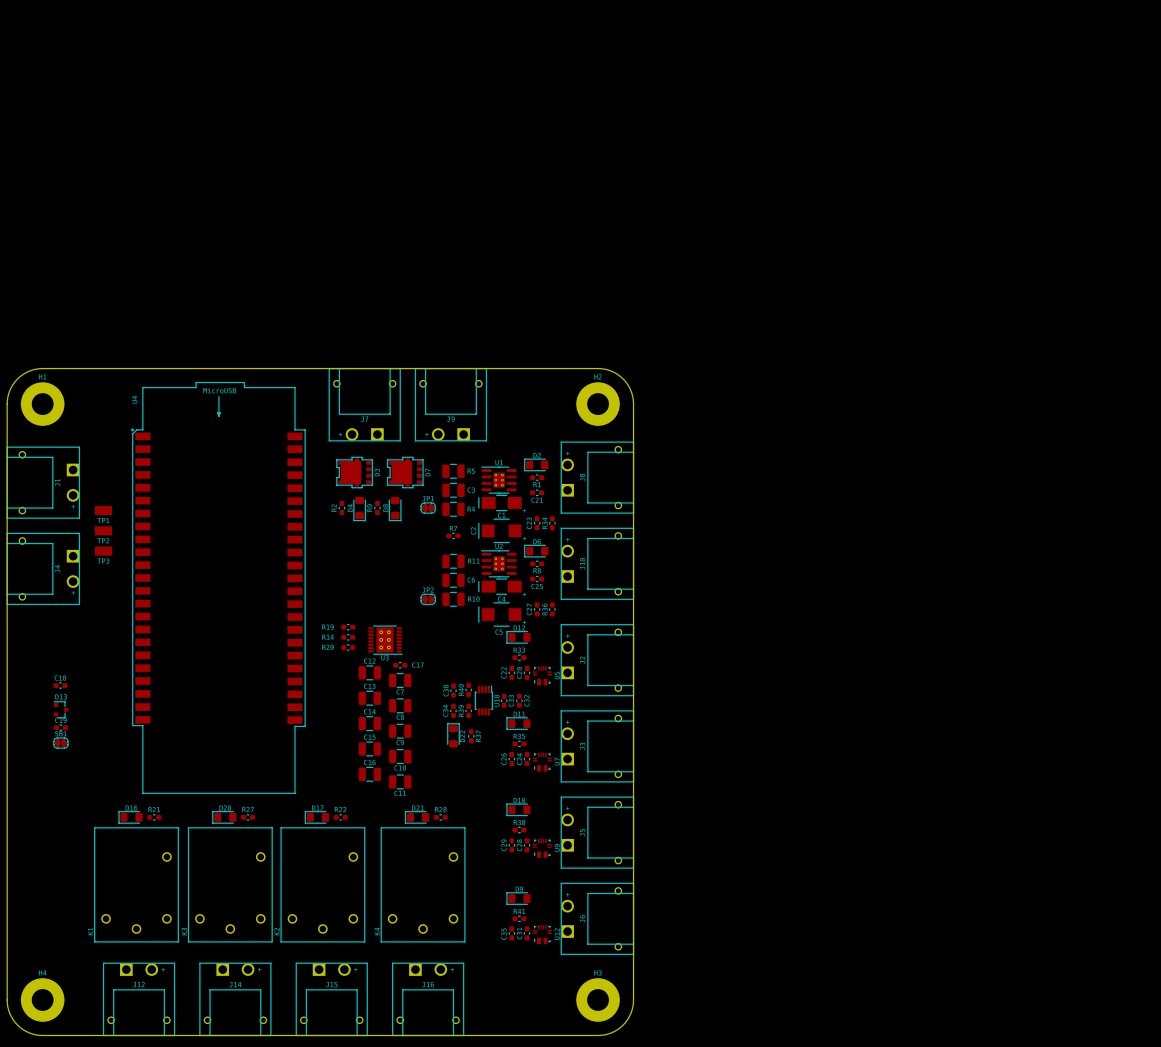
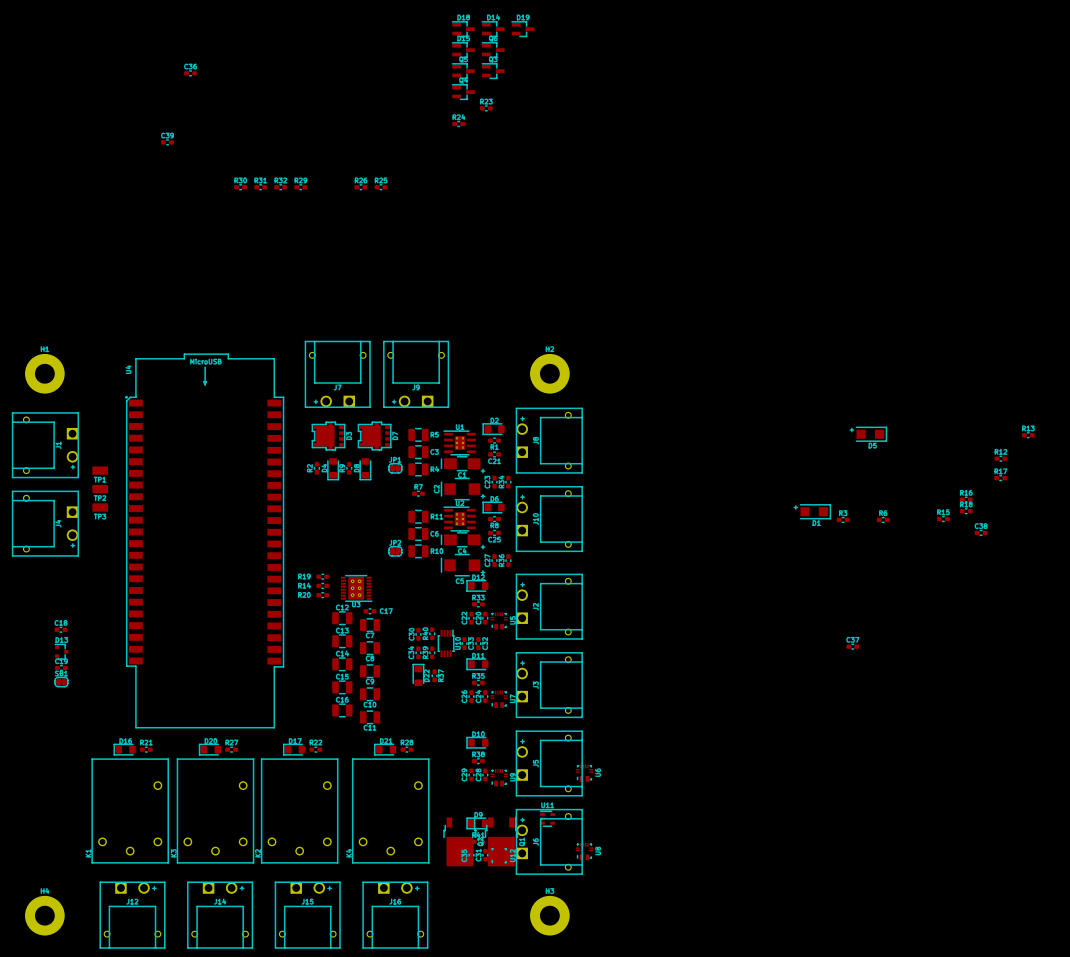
part: none -> (463, 29)
part: none -> (493, 29)
part: none -> (523, 29)
part: none -> (463, 50)
part: none -> (493, 50)
part: none -> (463, 71)
part: none -> (493, 71)
part: none -> (190, 73)
part: none -> (463, 92)
part: none -> (486, 108)
part: none -> (458, 124)
part: none -> (167, 142)
part: none -> (240, 187)
part: none -> (260, 187)
part: none -> (280, 187)
part: none -> (300, 187)
part: none -> (360, 187)
part: none -> (381, 187)
board edge: (42, 368) (598, 368) (614, 372) (625, 381) (630, 390) (633, 404) (633, 1000) (629, 1016) (620, 1027) (608, 1033) (598, 1035) (42, 1035) (25, 1031) (15, 1022) (8, 1010) (7, 1000) (7, 404) (9, 390) (17, 378) (29, 371) (42, 368) -> none
part: none -> (871, 434)
part: none -> (1028, 435)
part: none -> (1000, 458)
part: none -> (1000, 478)
part: none -> (966, 499)
part: none -> (815, 511)
part: none -> (966, 511)
part: none -> (943, 519)
part: none -> (843, 519)
part: none -> (883, 519)
part: none -> (981, 532)
part: none -> (852, 646)
part: none -> (584, 773)
part: none -> (547, 818)
part: none -> (459, 841)
part: none -> (501, 841)
part: none -> (584, 851)

